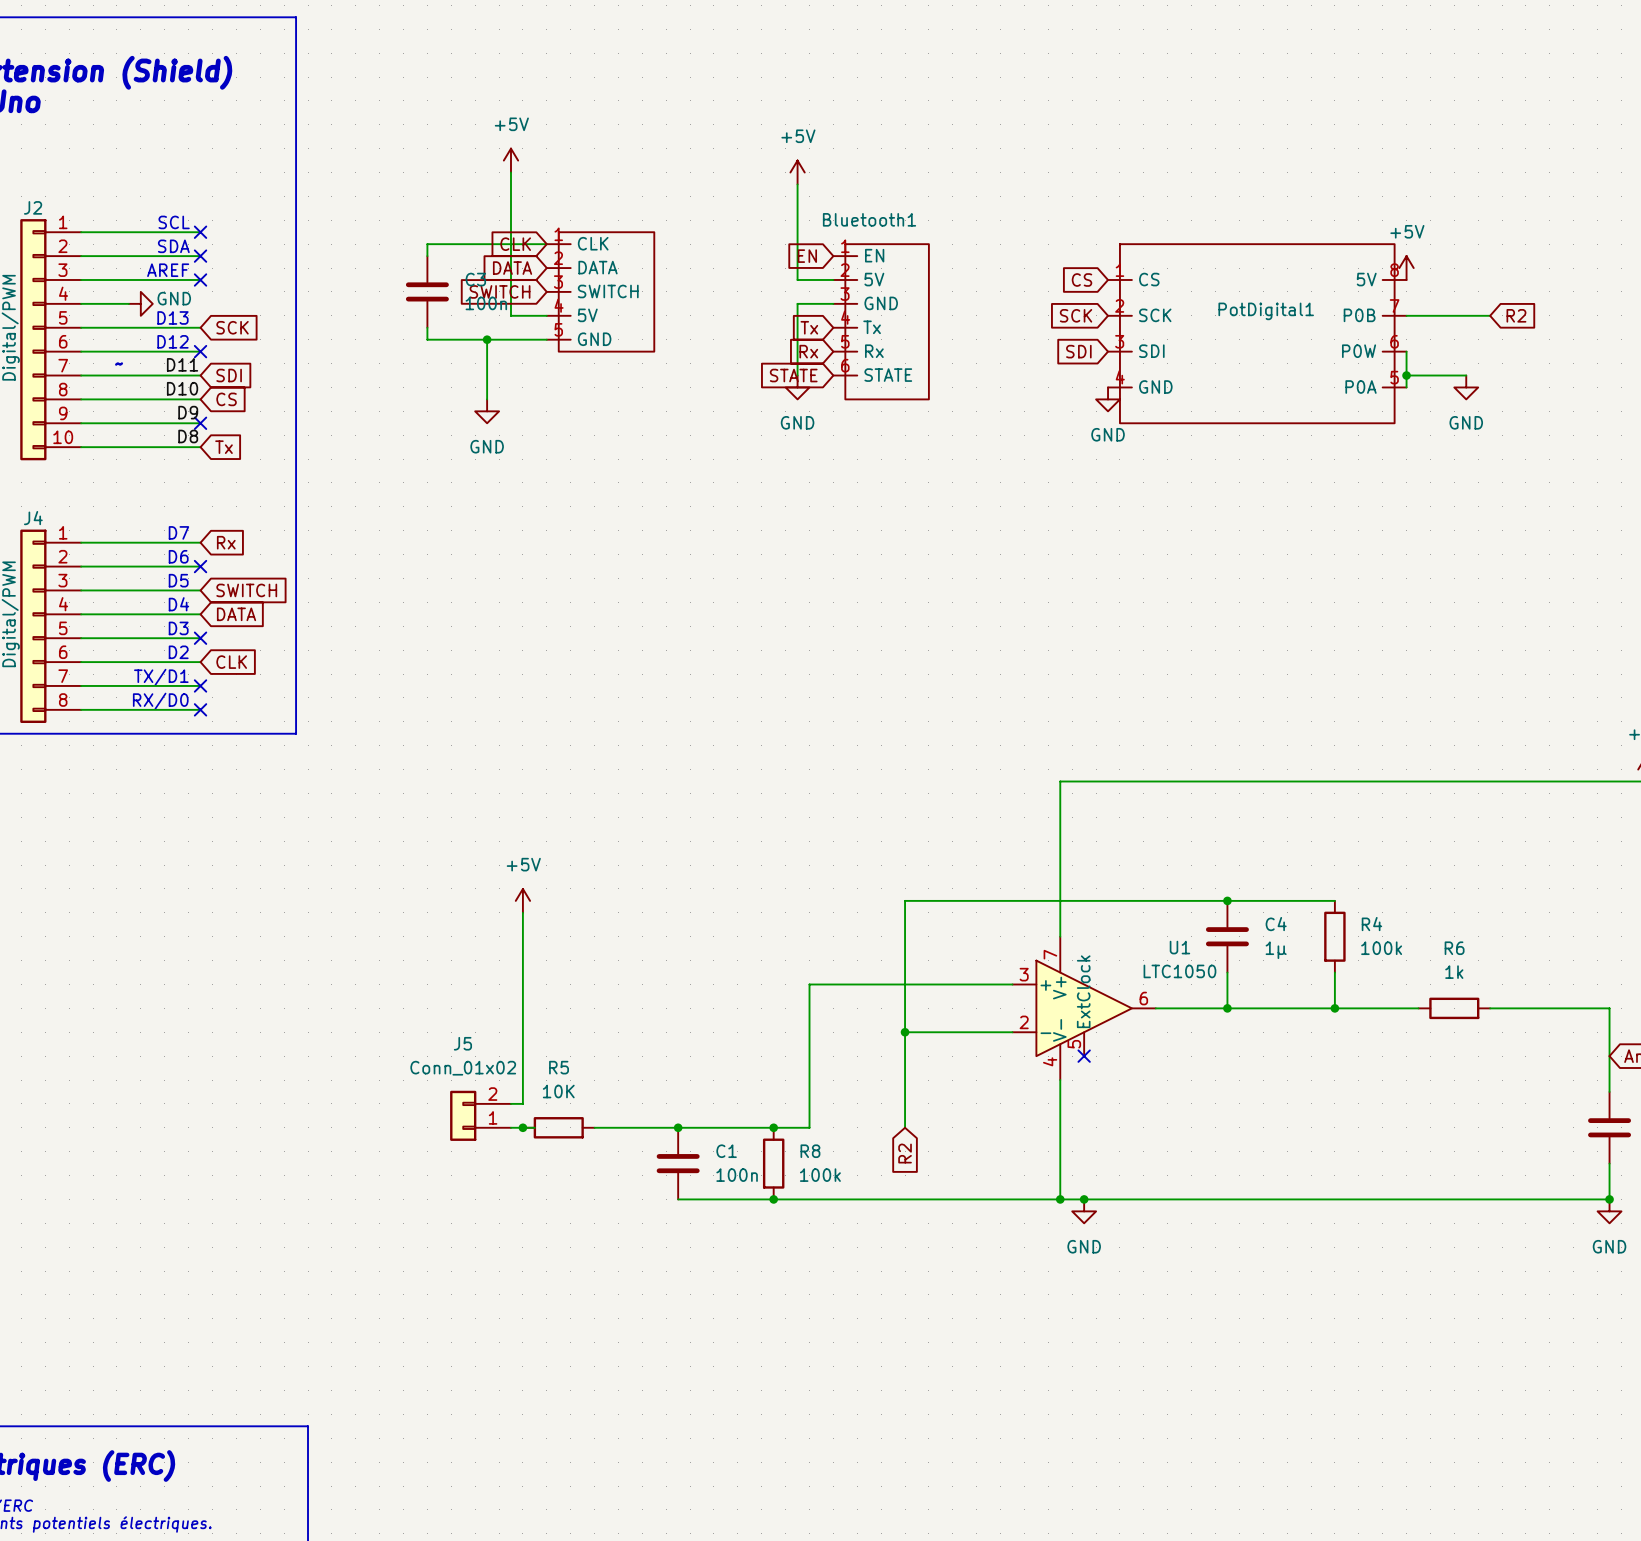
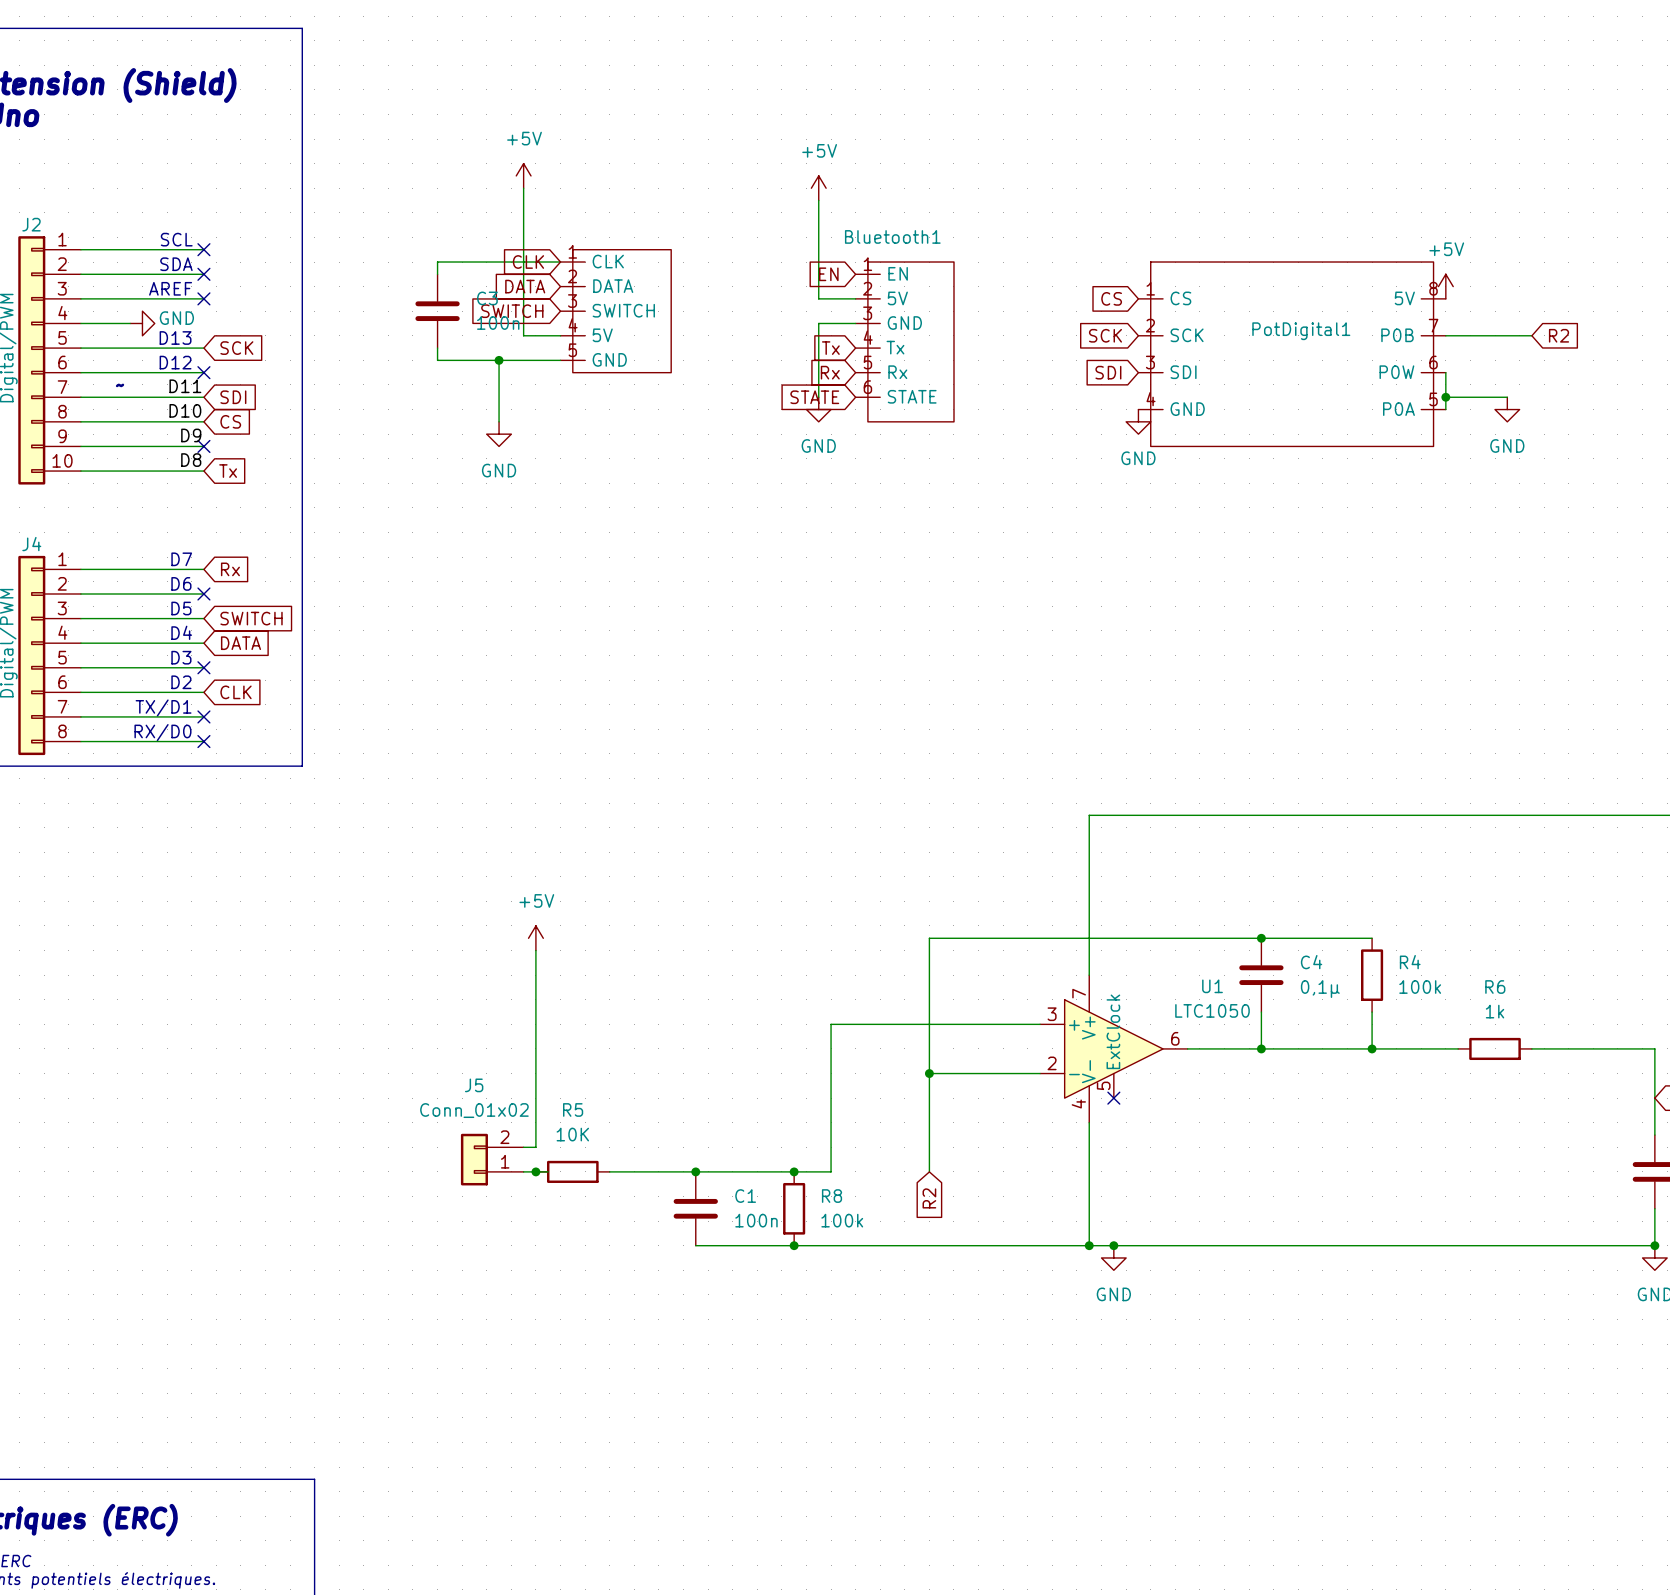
C4 value: 1µ (1276, 950) -> 0,1µ (1320, 989)

